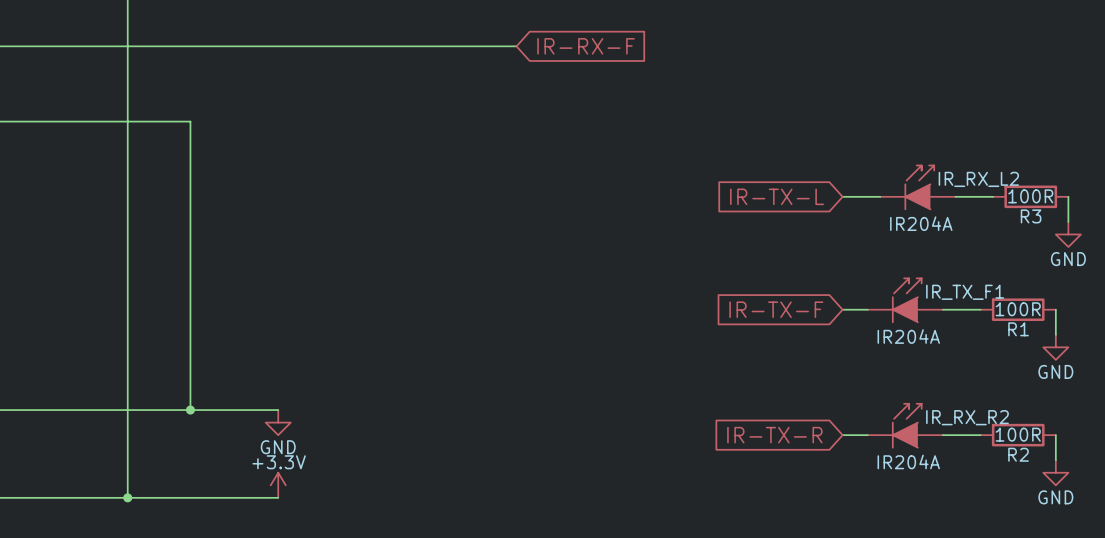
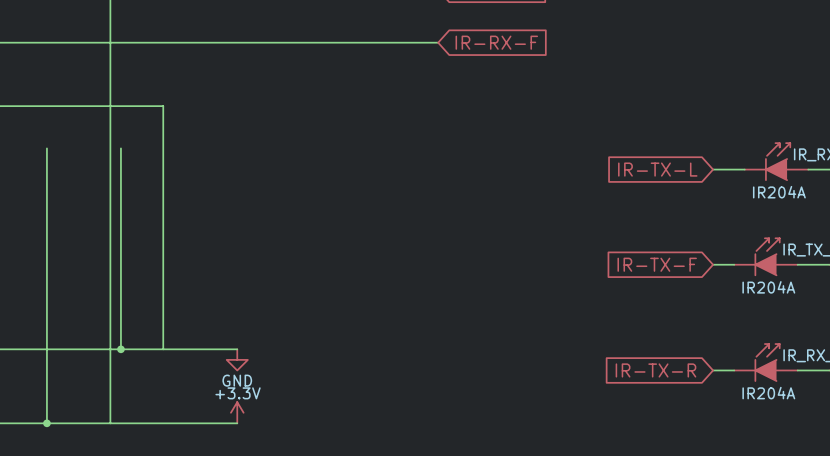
wire: none -> (46, 148) (46, 423)
wire: none -> (120, 148) (120, 349)
junction: none -> (120, 349)
junction: (190, 410) -> none
junction: none -> (46, 423)
junction: (127, 497) -> none

